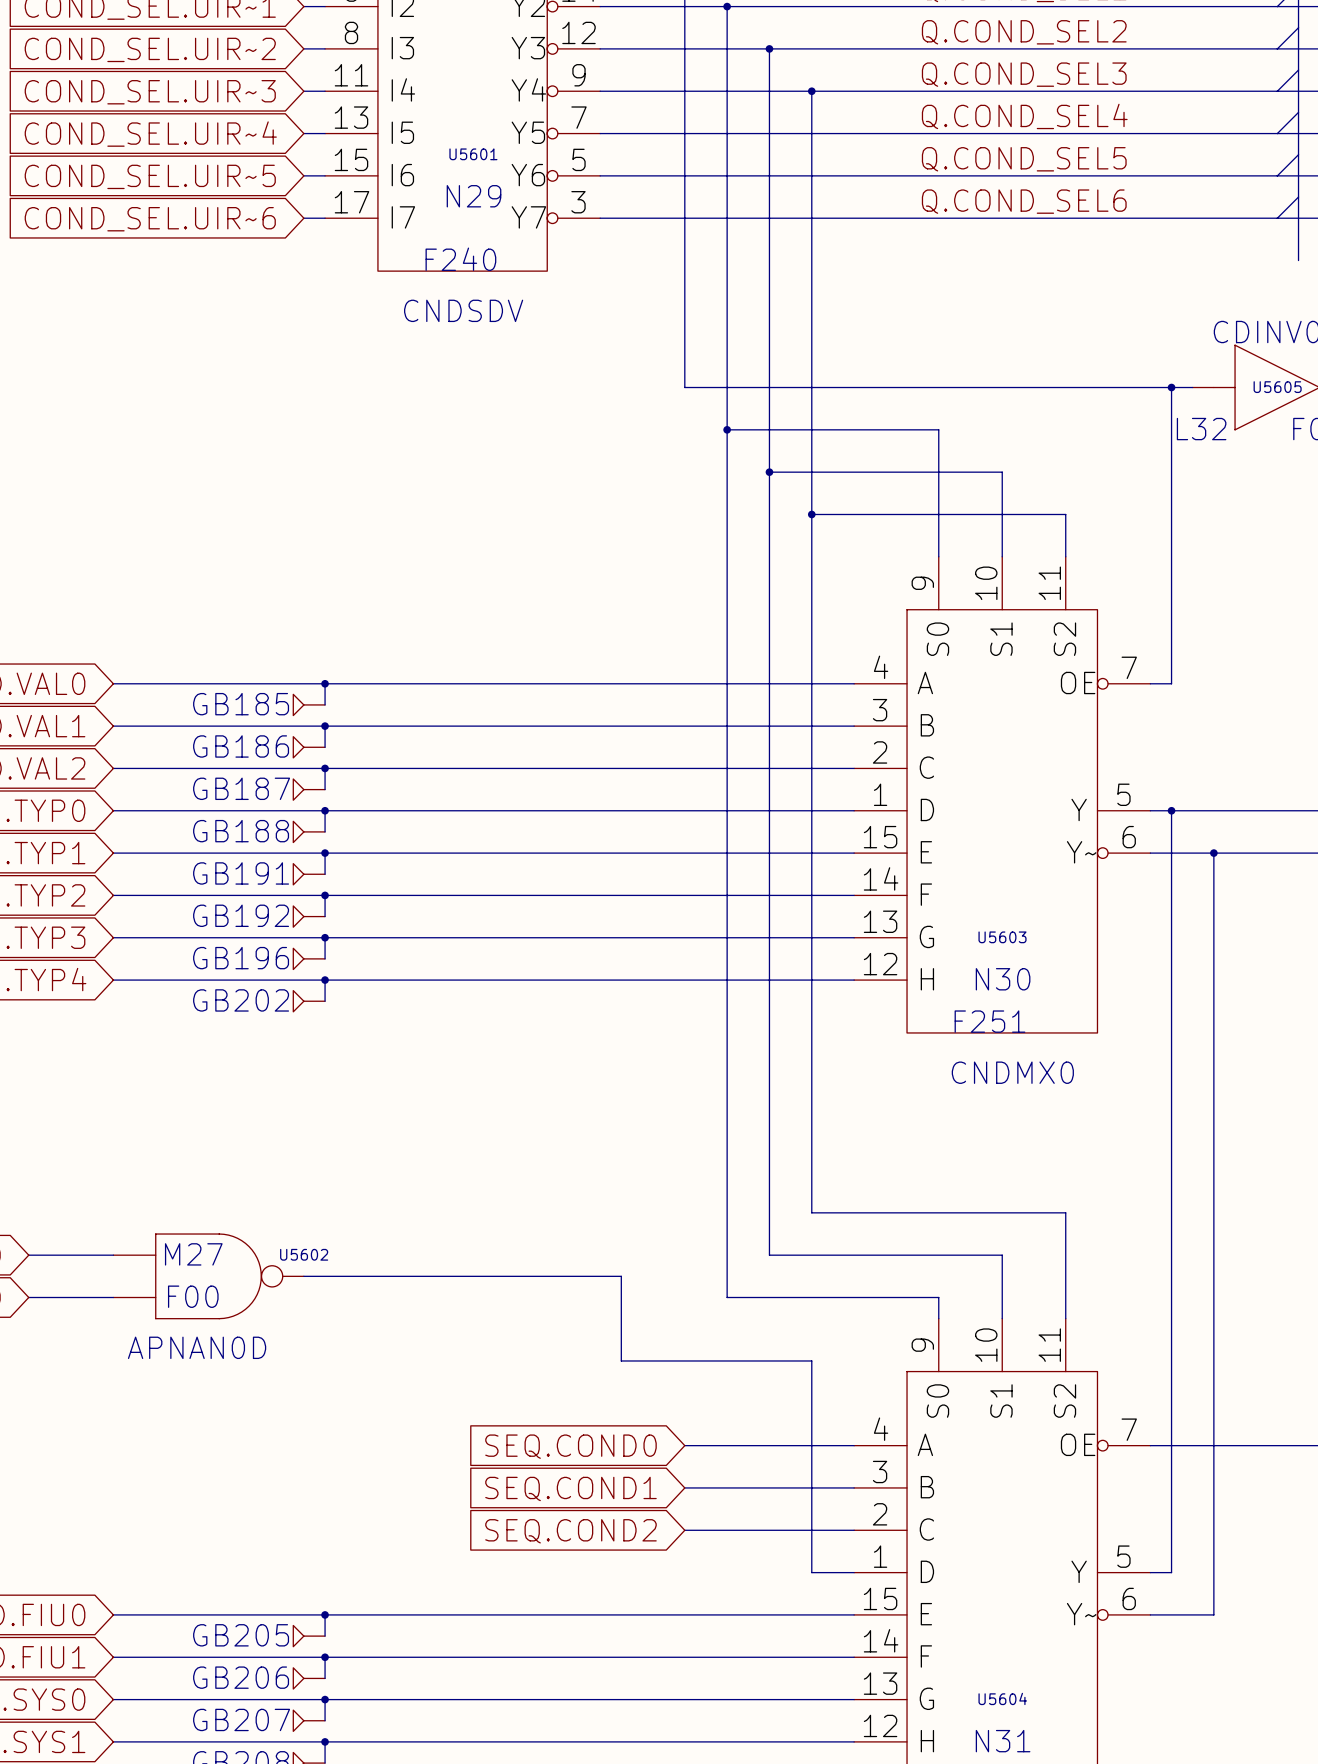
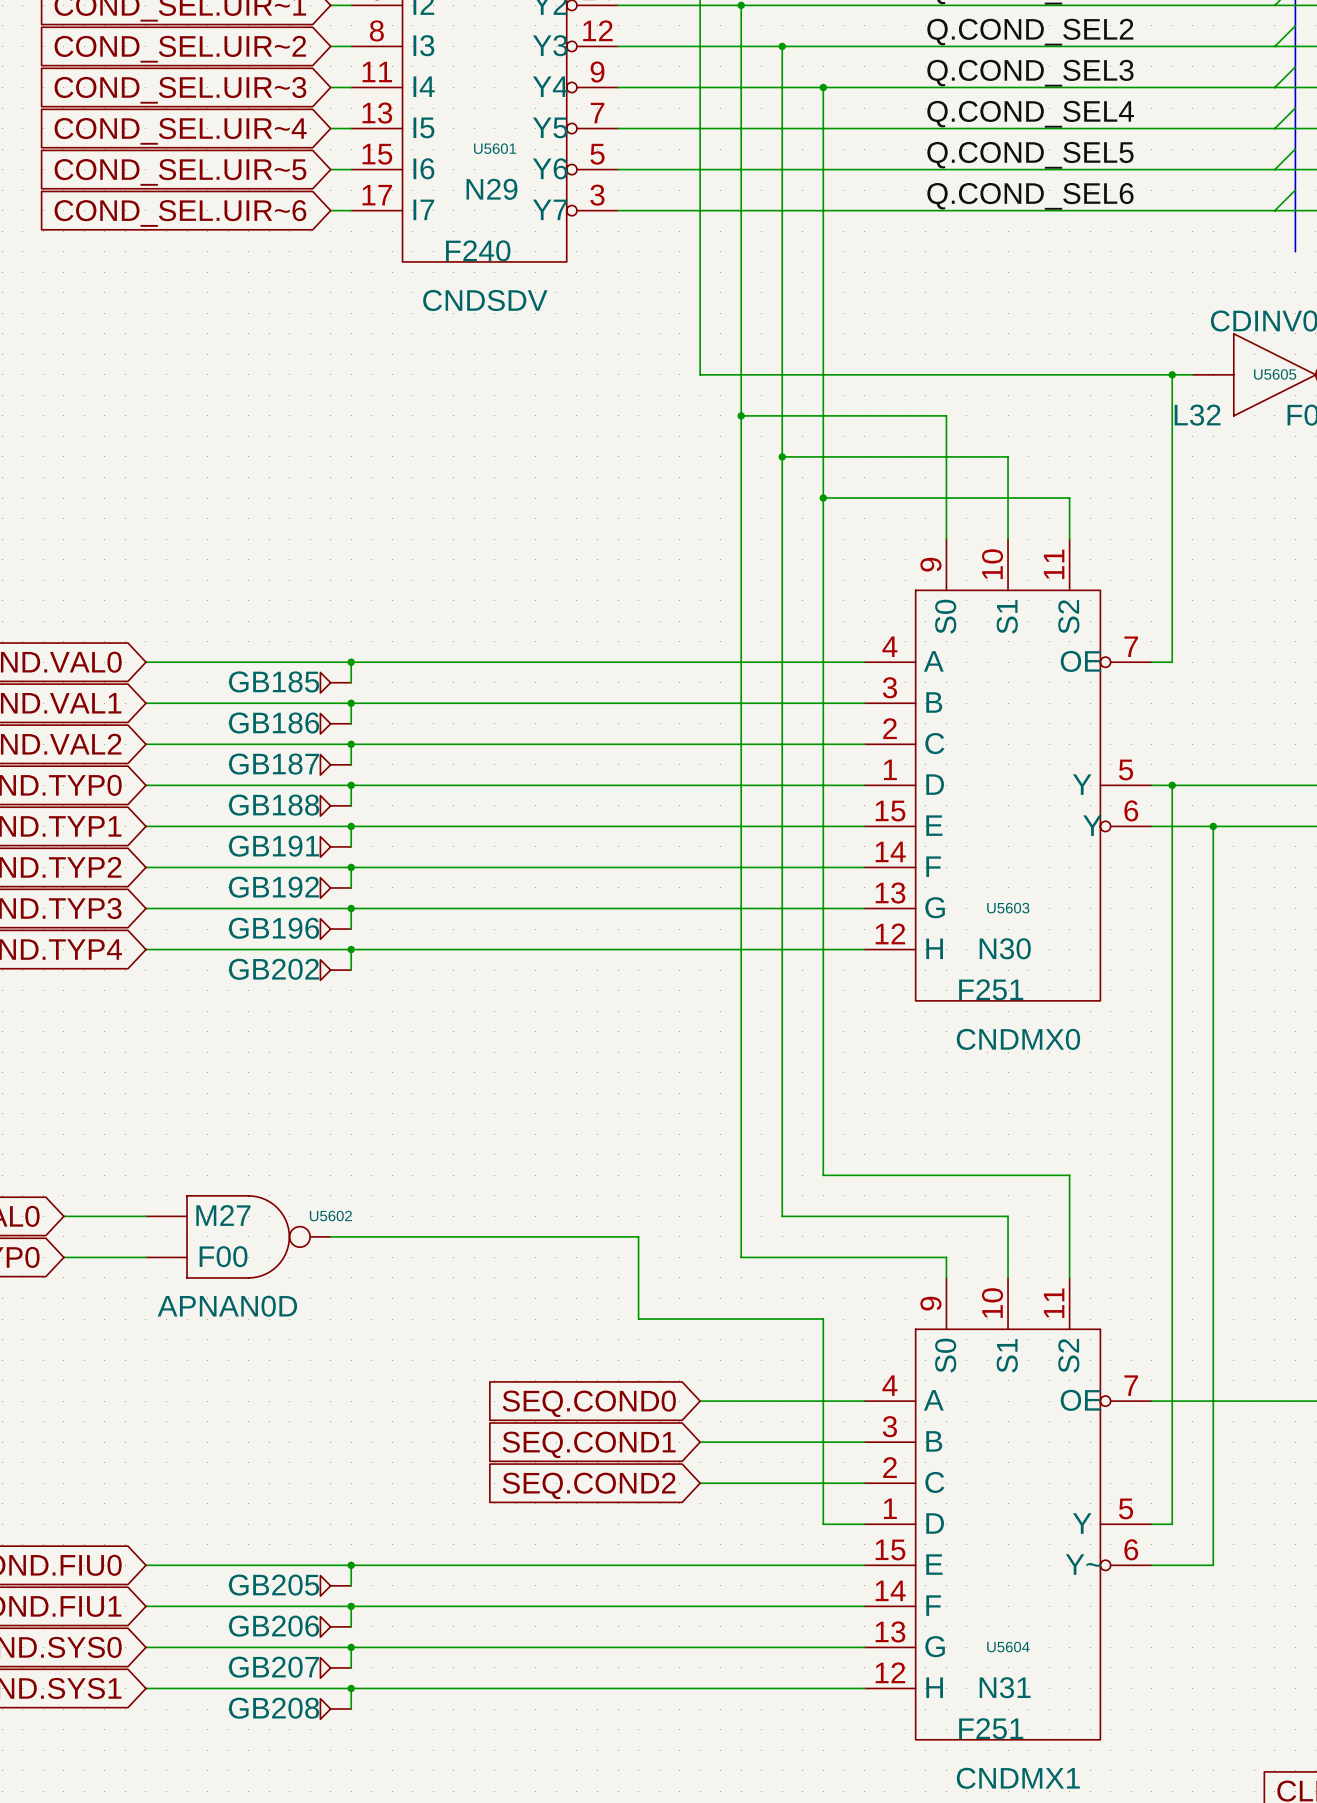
U5603 pin name: Y~ (1081, 852) -> Y (1092, 825)

